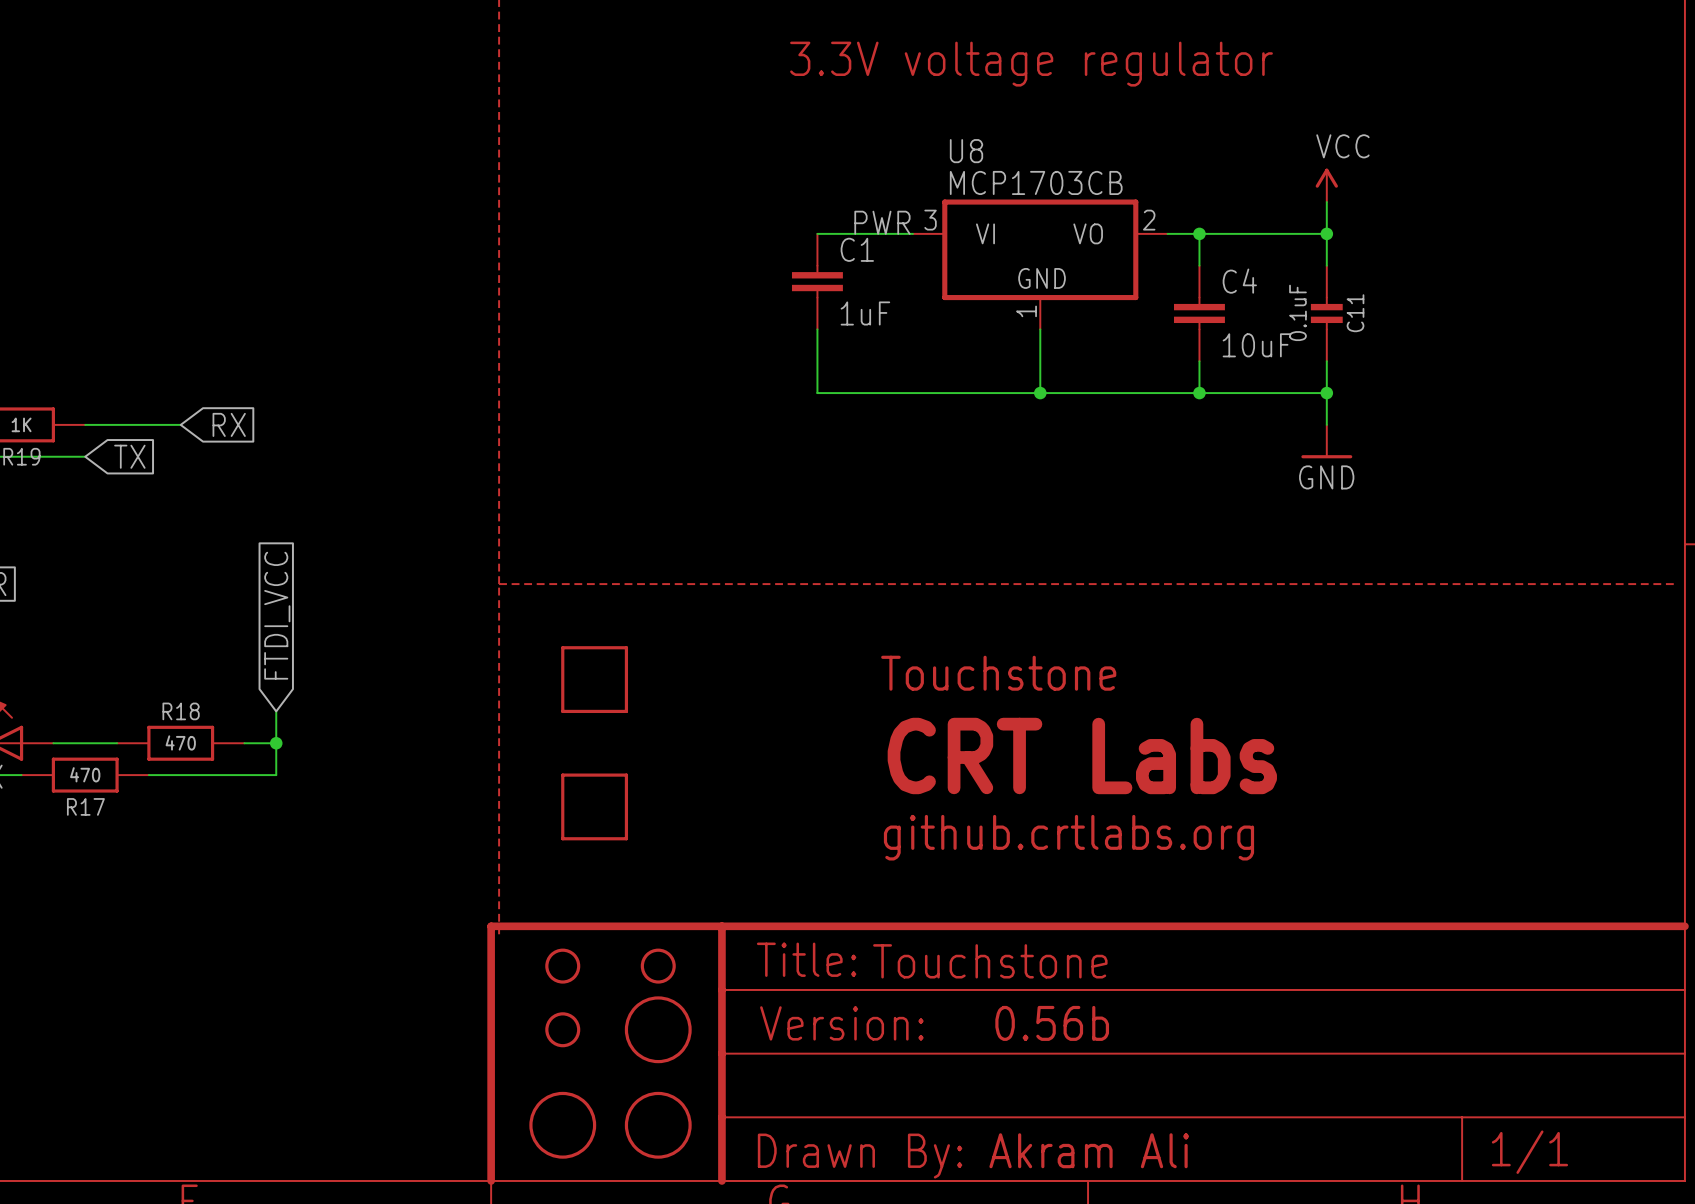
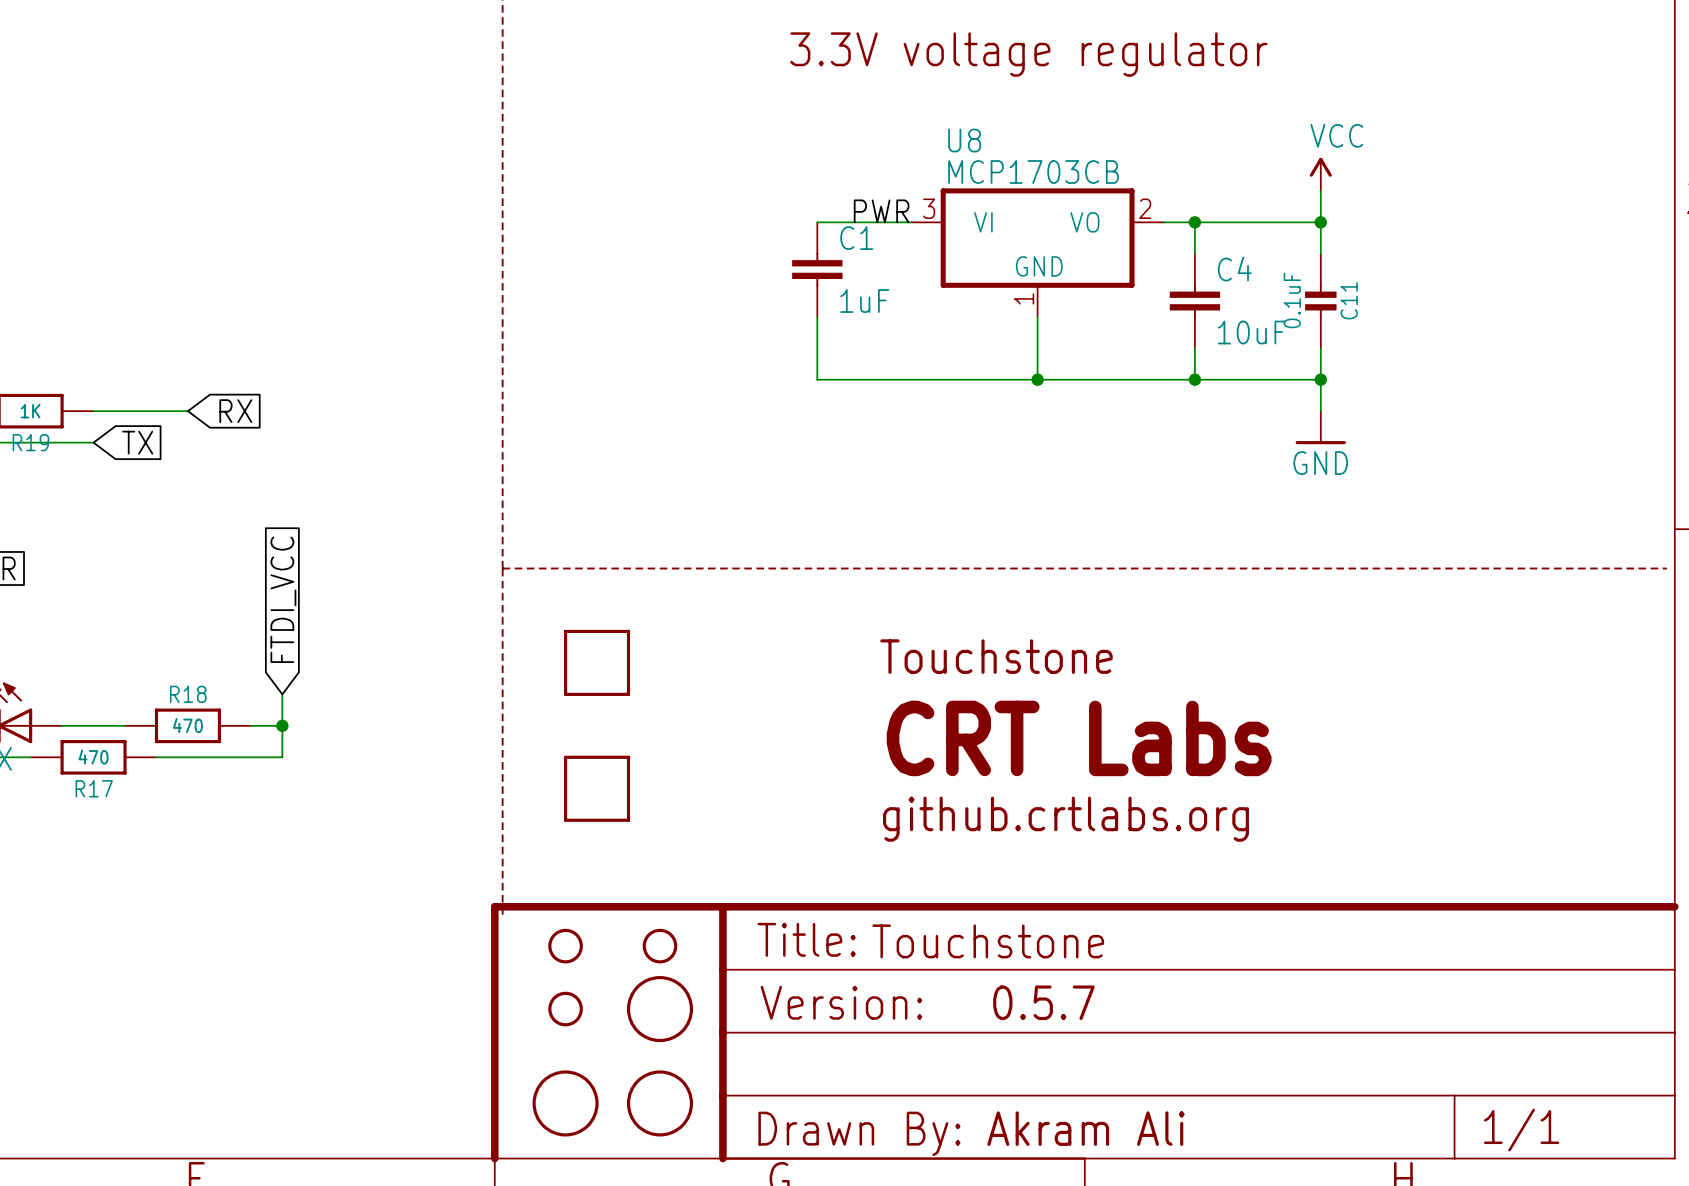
text: 0.56b (1052, 1023) -> 0.5.7 (1043, 1002)

